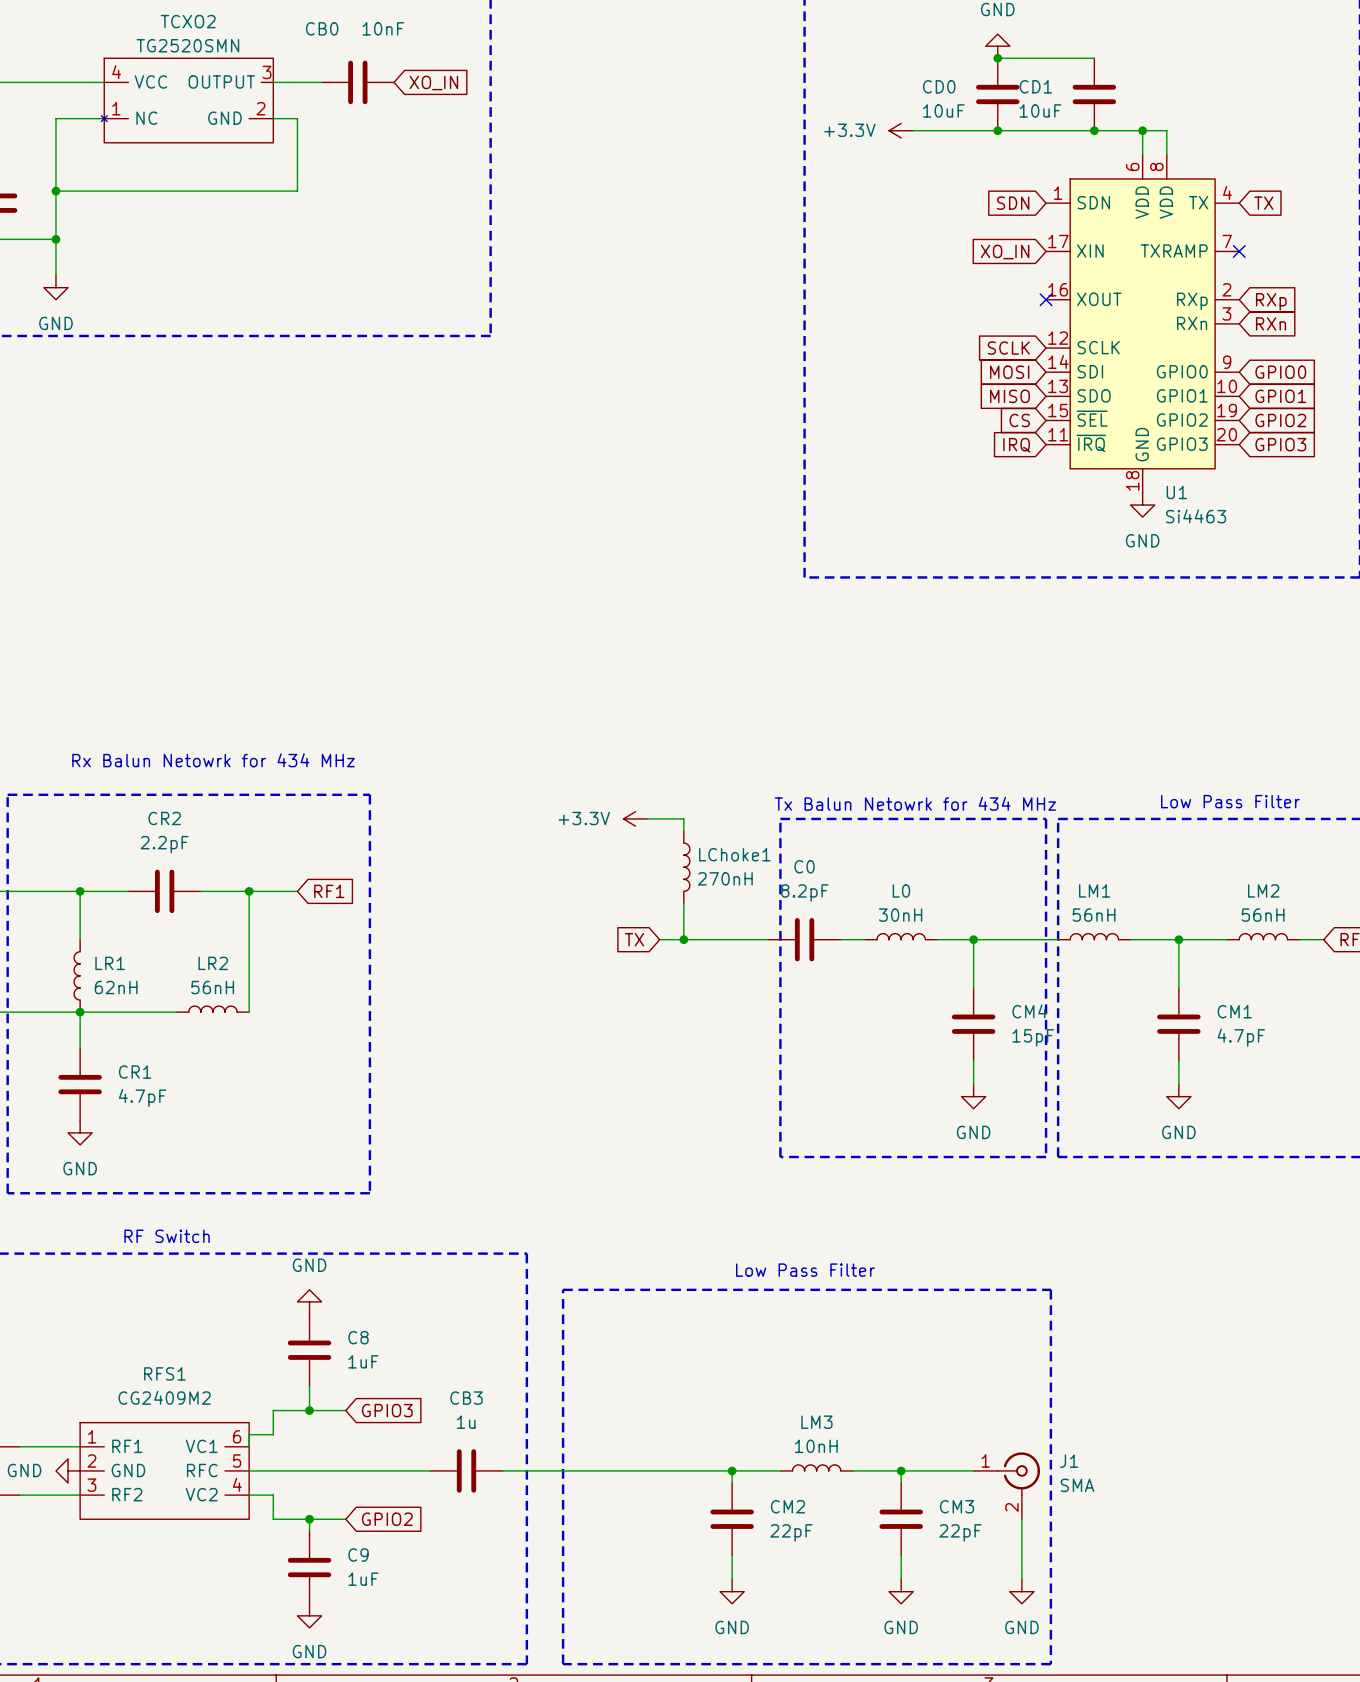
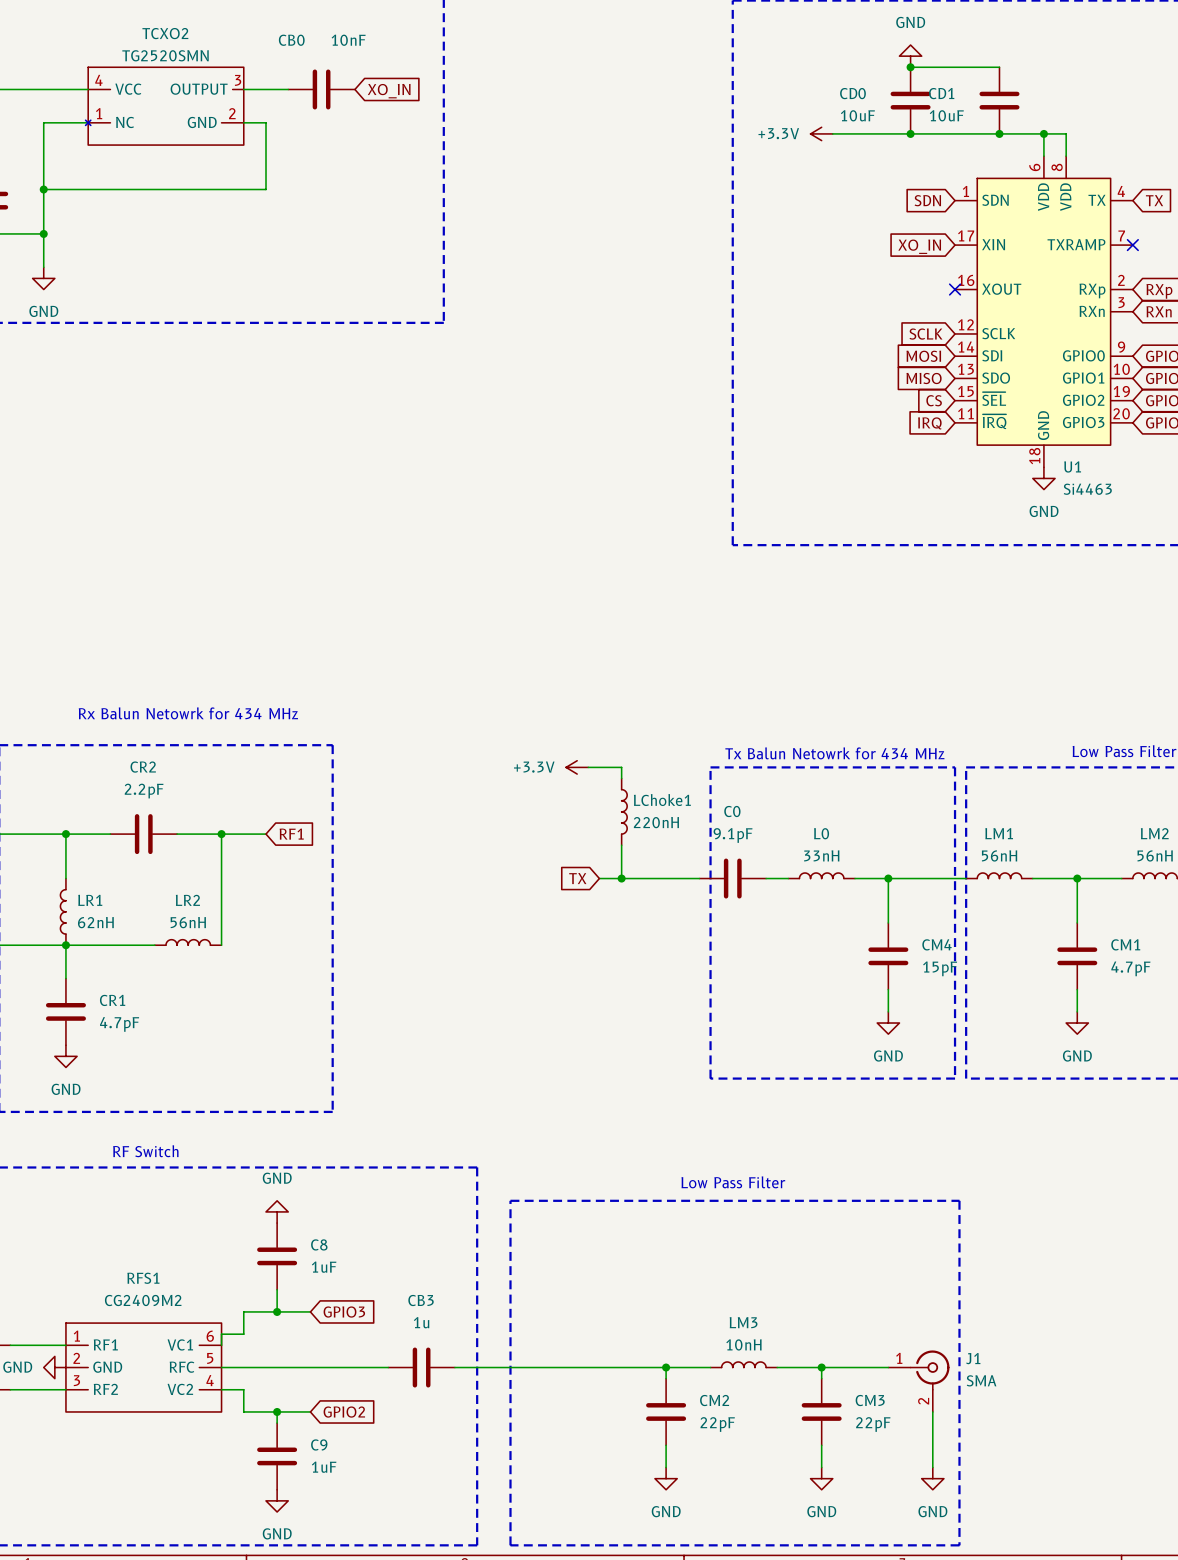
LChoke1 value: 270nH (725, 878) -> 220nH (656, 822)
C0 value: 8.2pF (804, 892) -> 9.1pF (733, 835)
L0 value: 30nH (900, 915) -> 33nH (821, 855)

